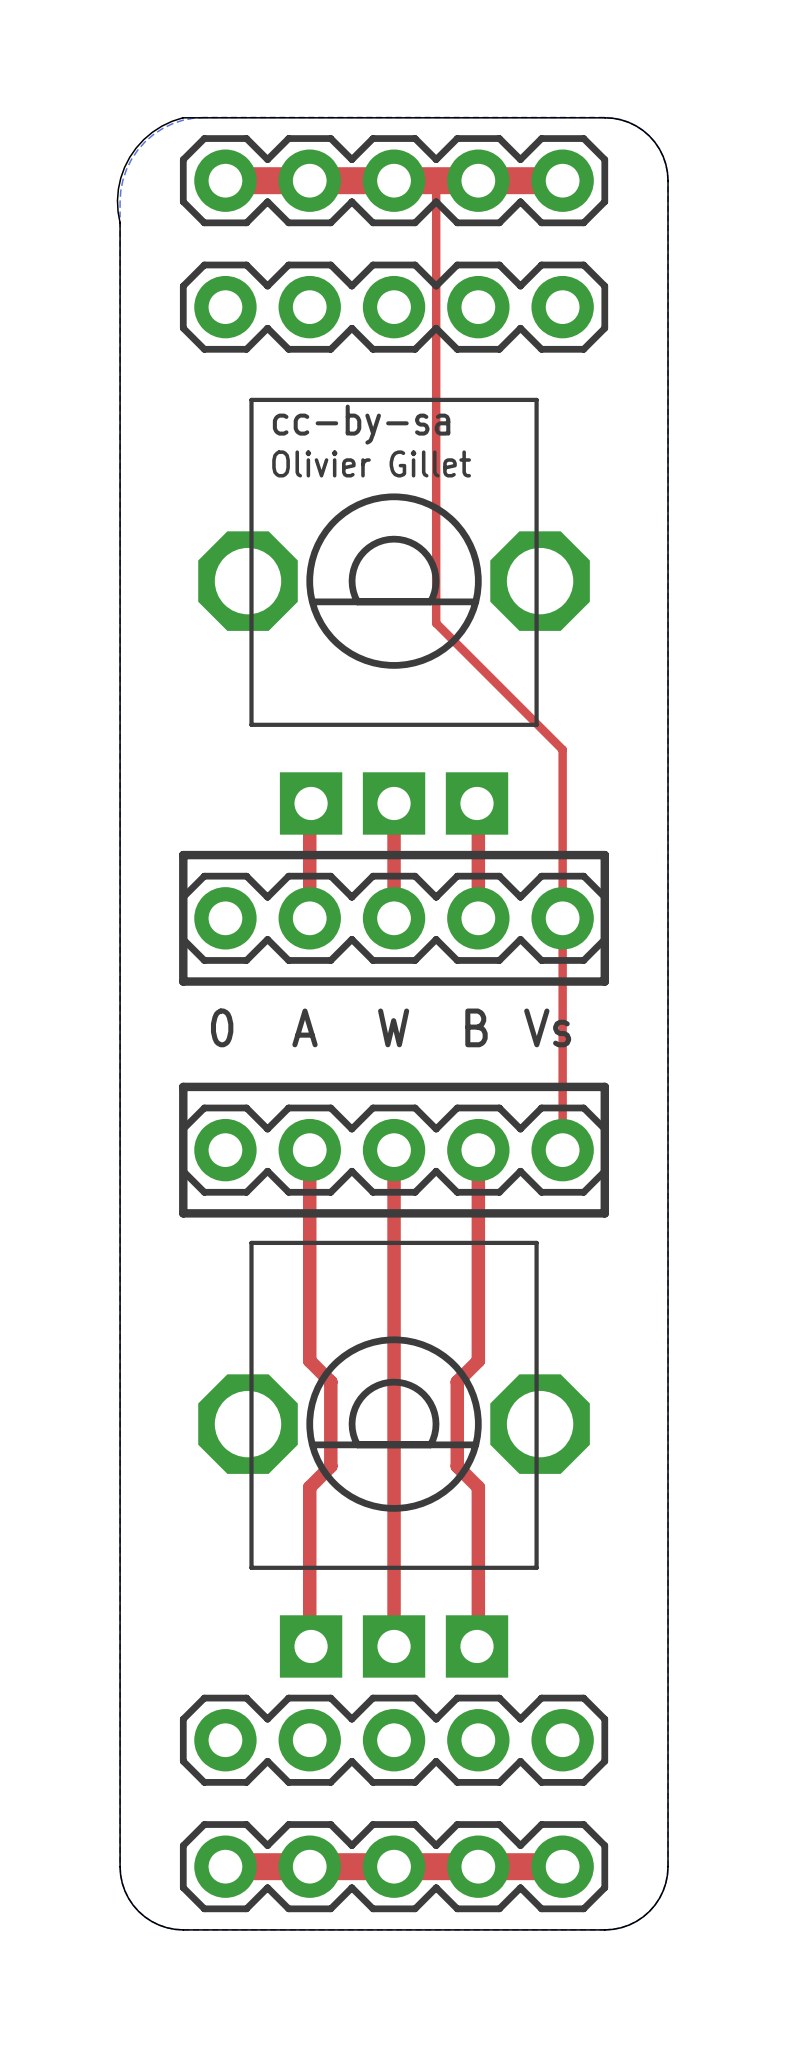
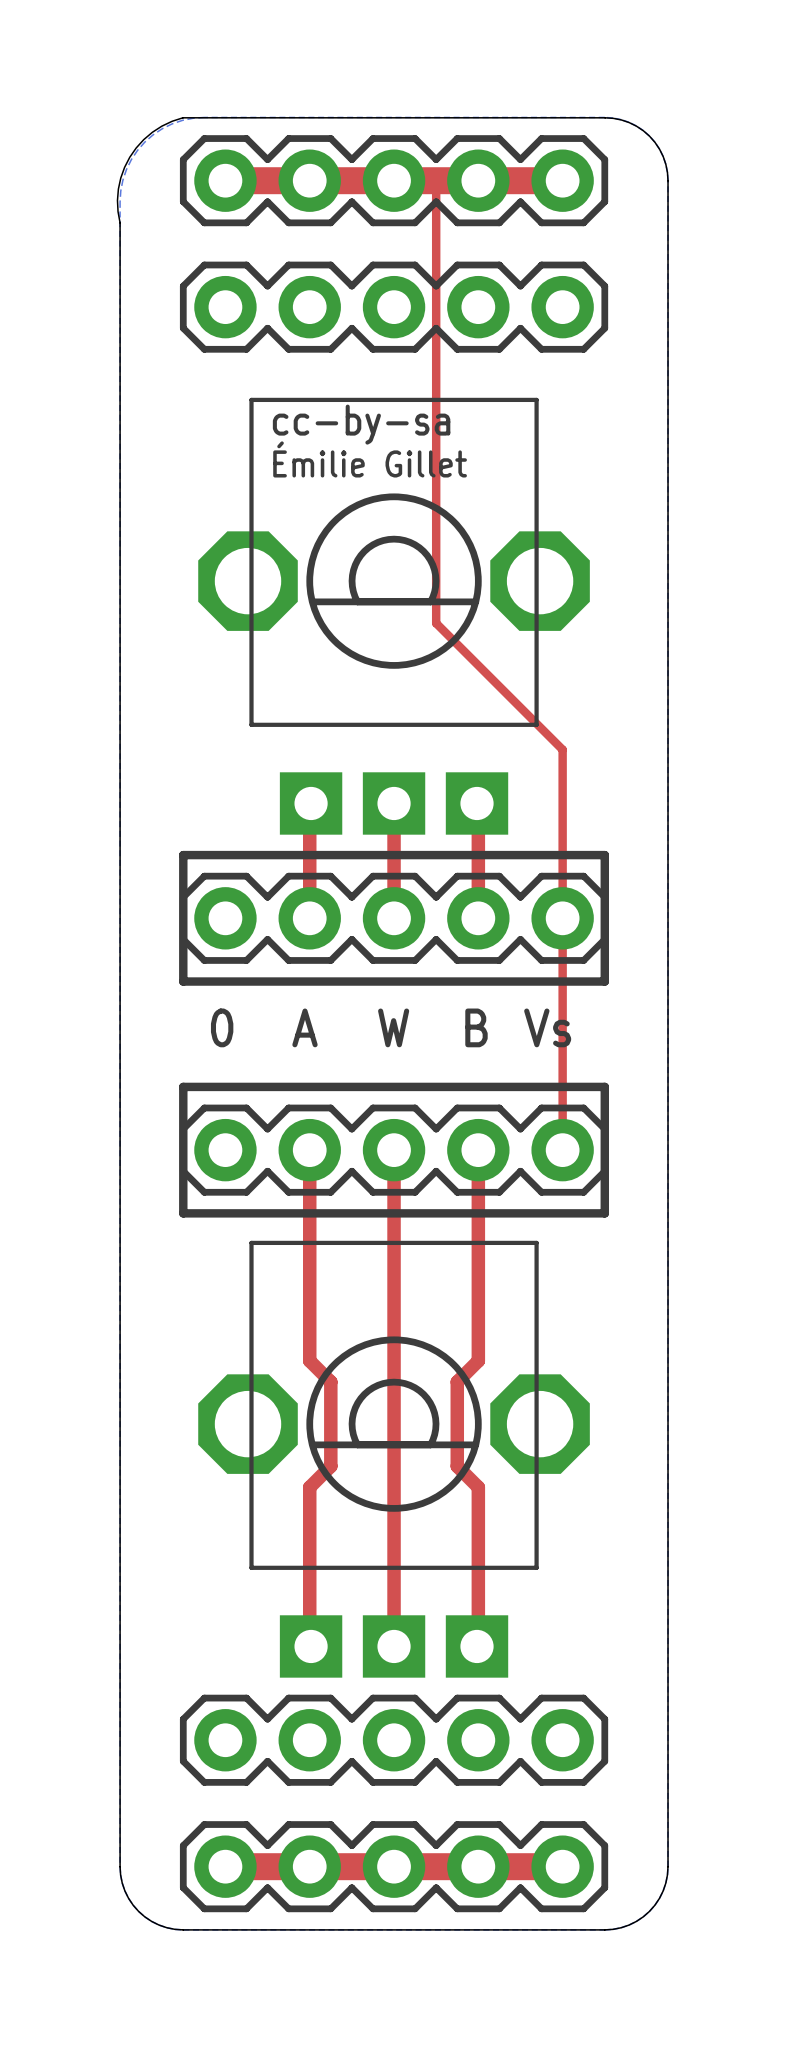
text: Olivier Gillet (371, 463) -> Émilie Gillet (370, 459)

